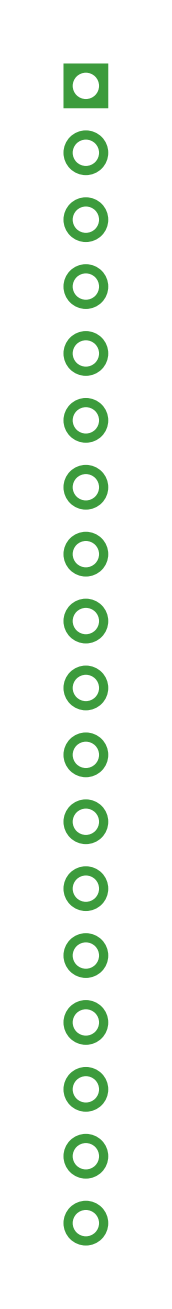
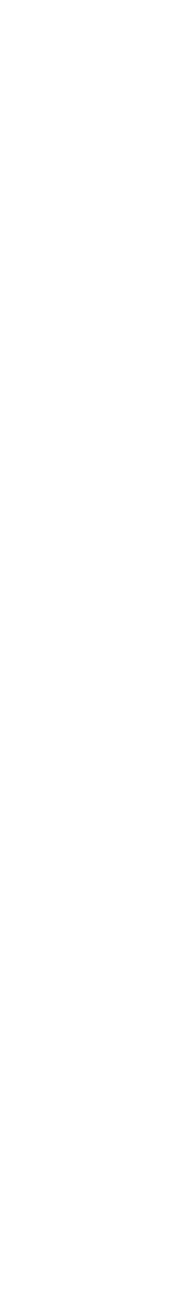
part: (85, 654) -> none

